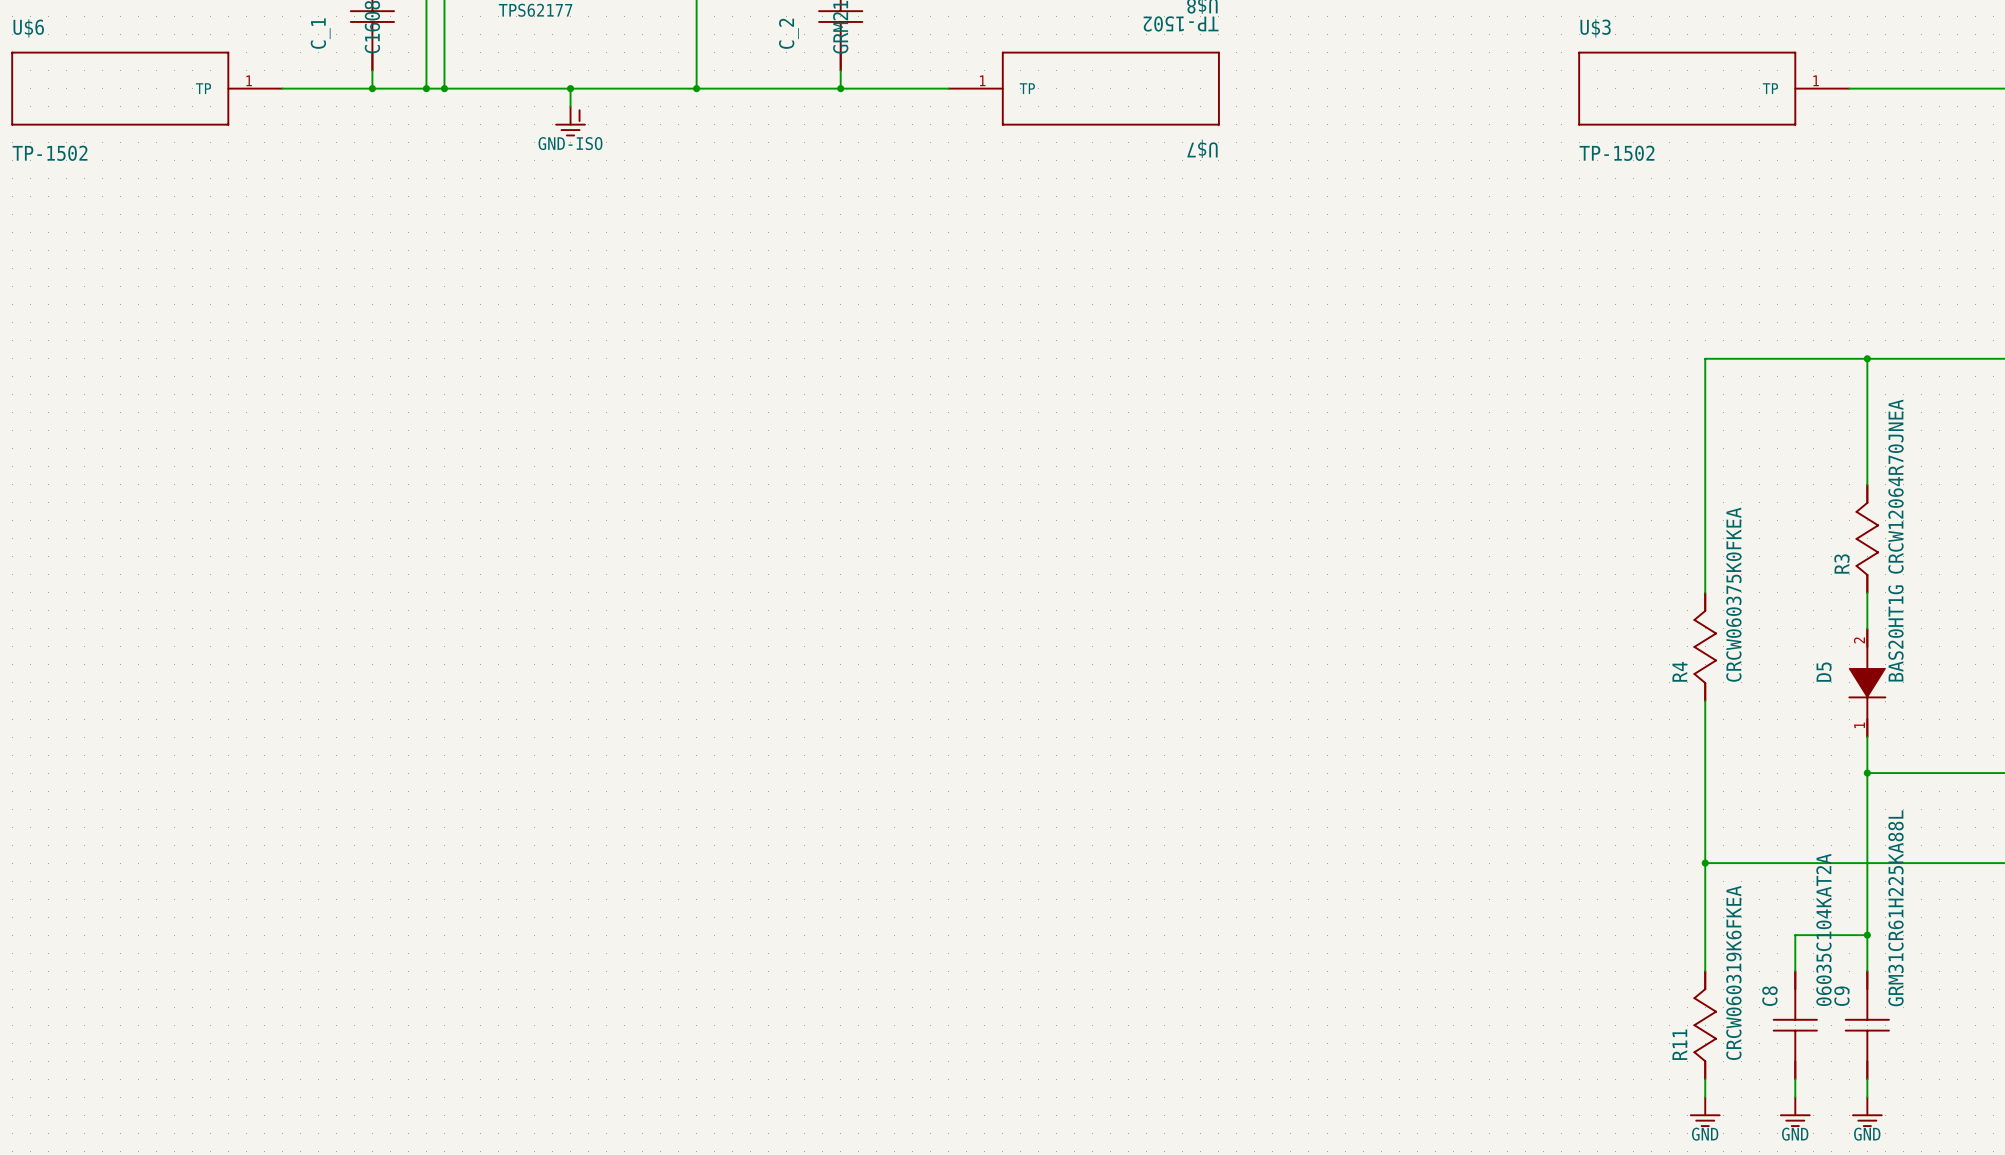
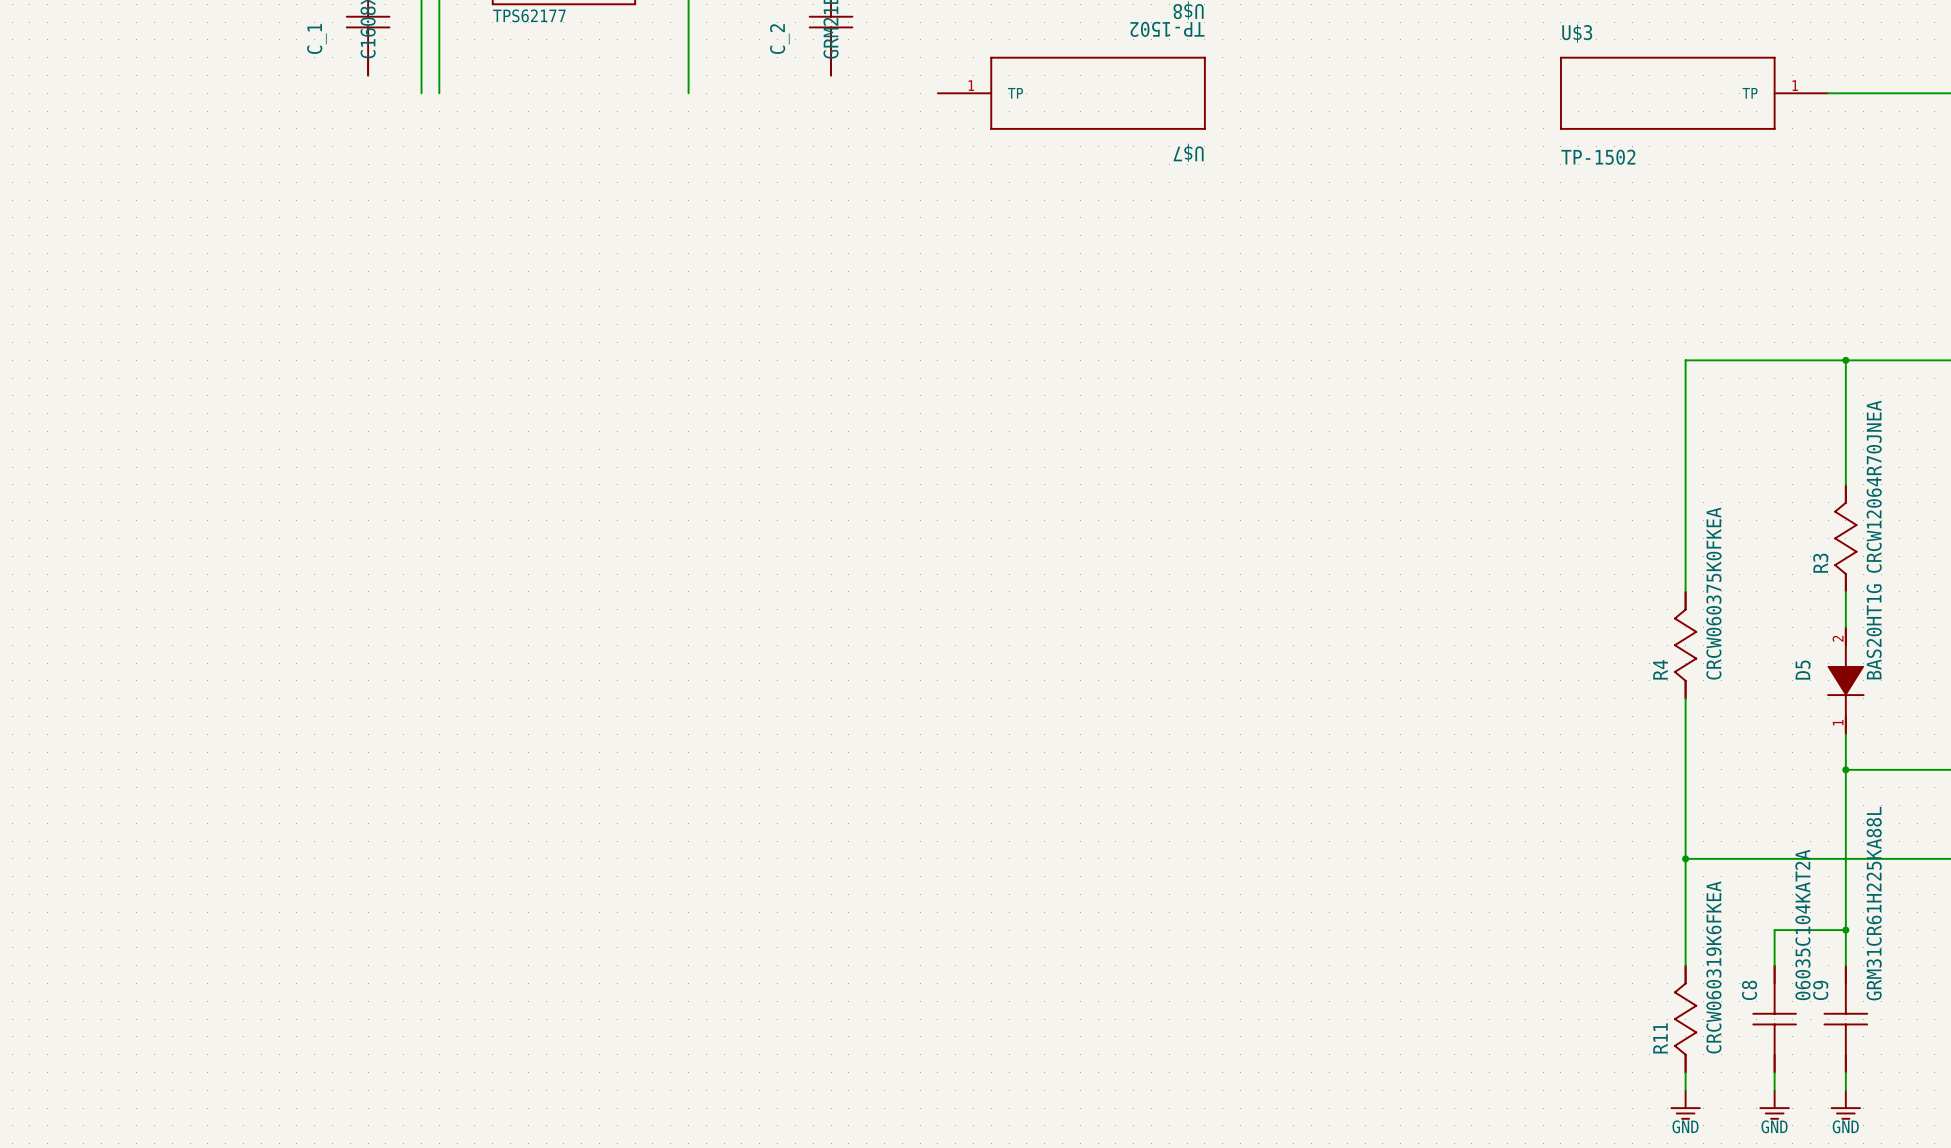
wire: (372, 70) (372, 88) -> none
wire: (840, 70) (840, 88) -> none
U$6: TP-1502 (147, 88) -> none
wire: (282, 88) (948, 88) -> none
junction: (372, 88) -> none
junction: (426, 88) -> none
junction: (444, 88) -> none
wire: (570, 88) (570, 106) -> none
junction: (570, 88) -> none
junction: (696, 88) -> none
junction: (840, 88) -> none
power symbol: GND-ISO (570, 121) -> none

